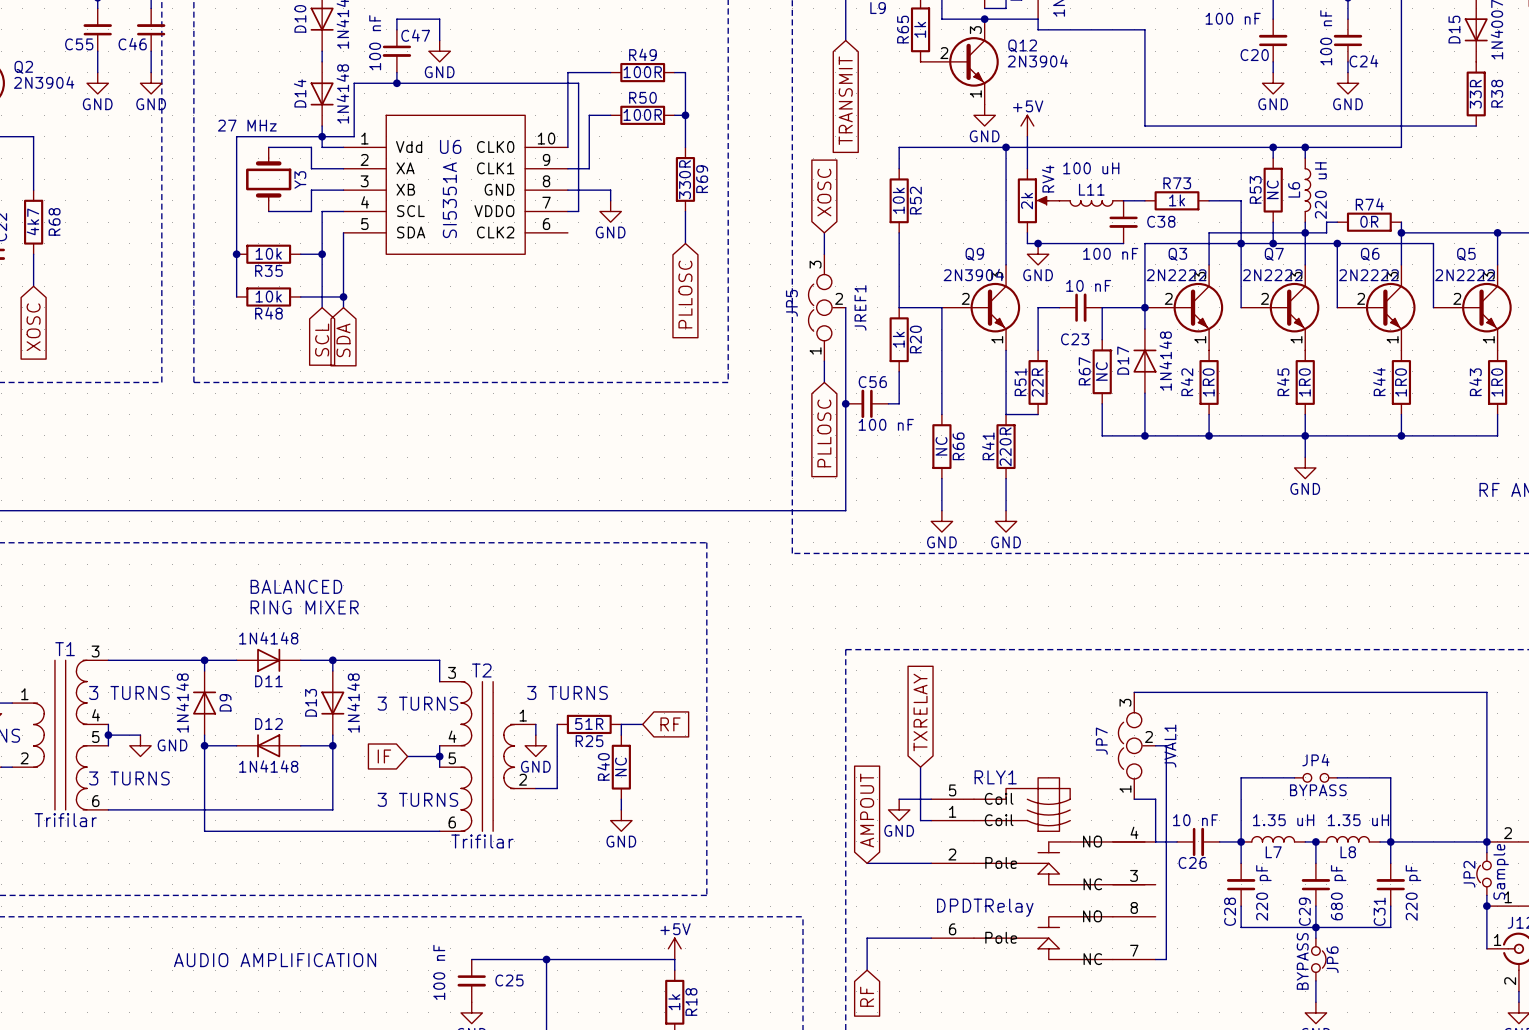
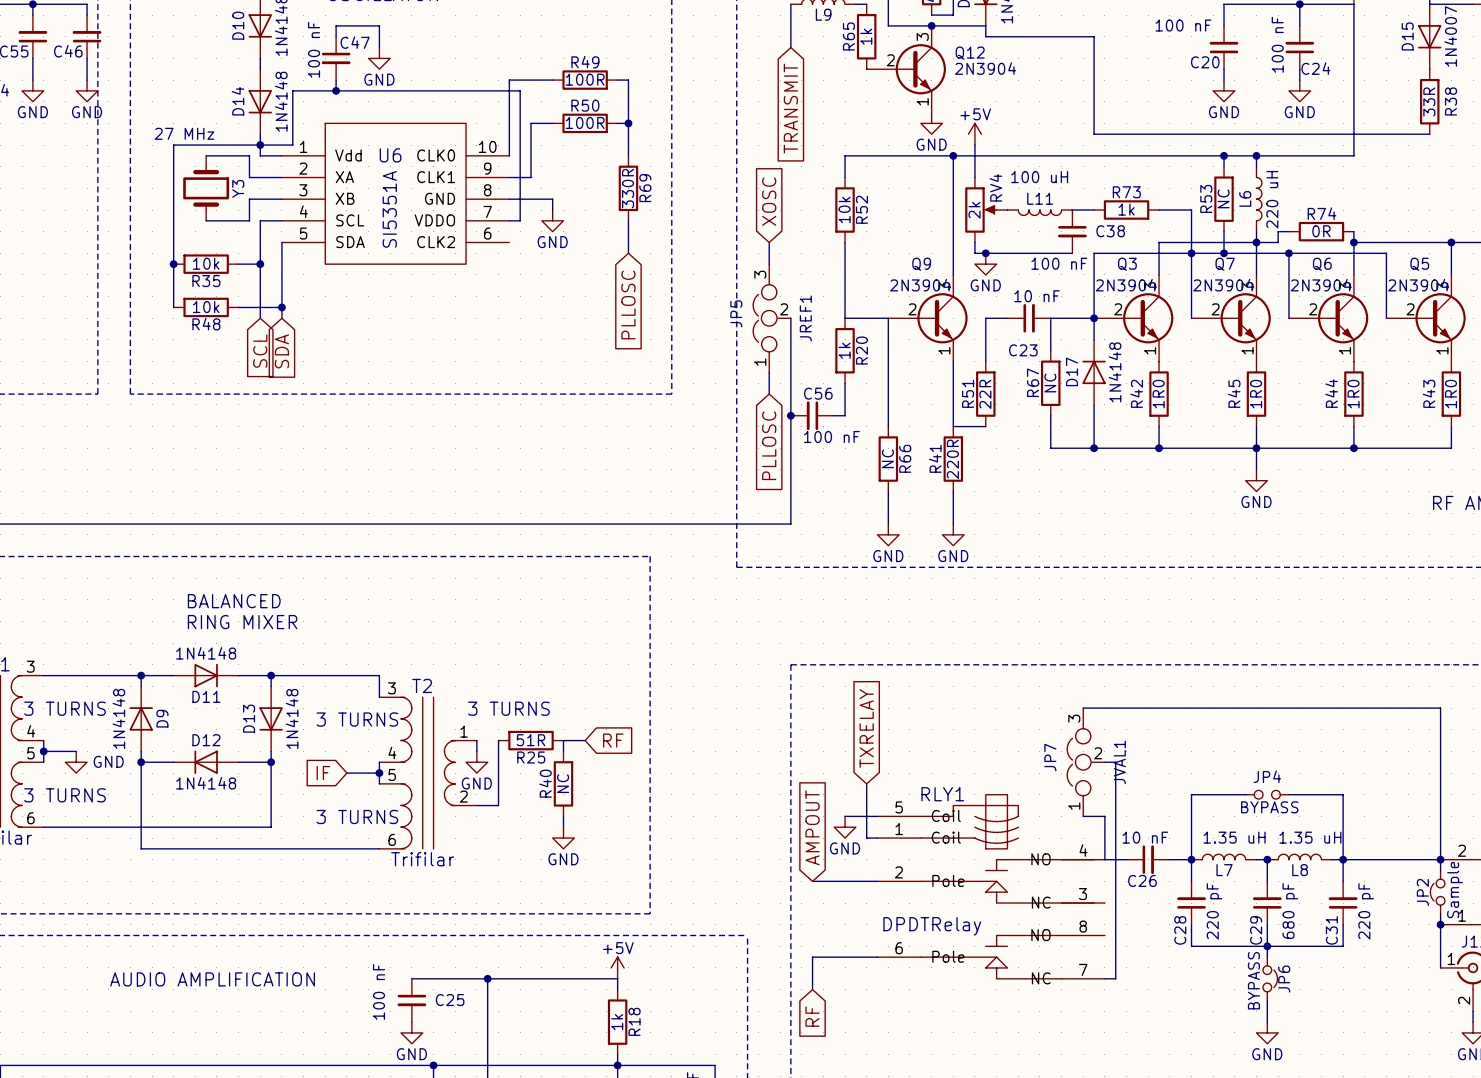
Q3 value: 2N2222 (1176, 275) -> 2N3904 (1126, 285)
Q7 value: 2N2222 (1272, 275) -> 2N3904 (1223, 285)
Q6 value: 2N2222 (1368, 275) -> 2N3904 (1321, 285)
Q5 value: 2N2222 (1465, 275) -> 2N3904 (1418, 285)

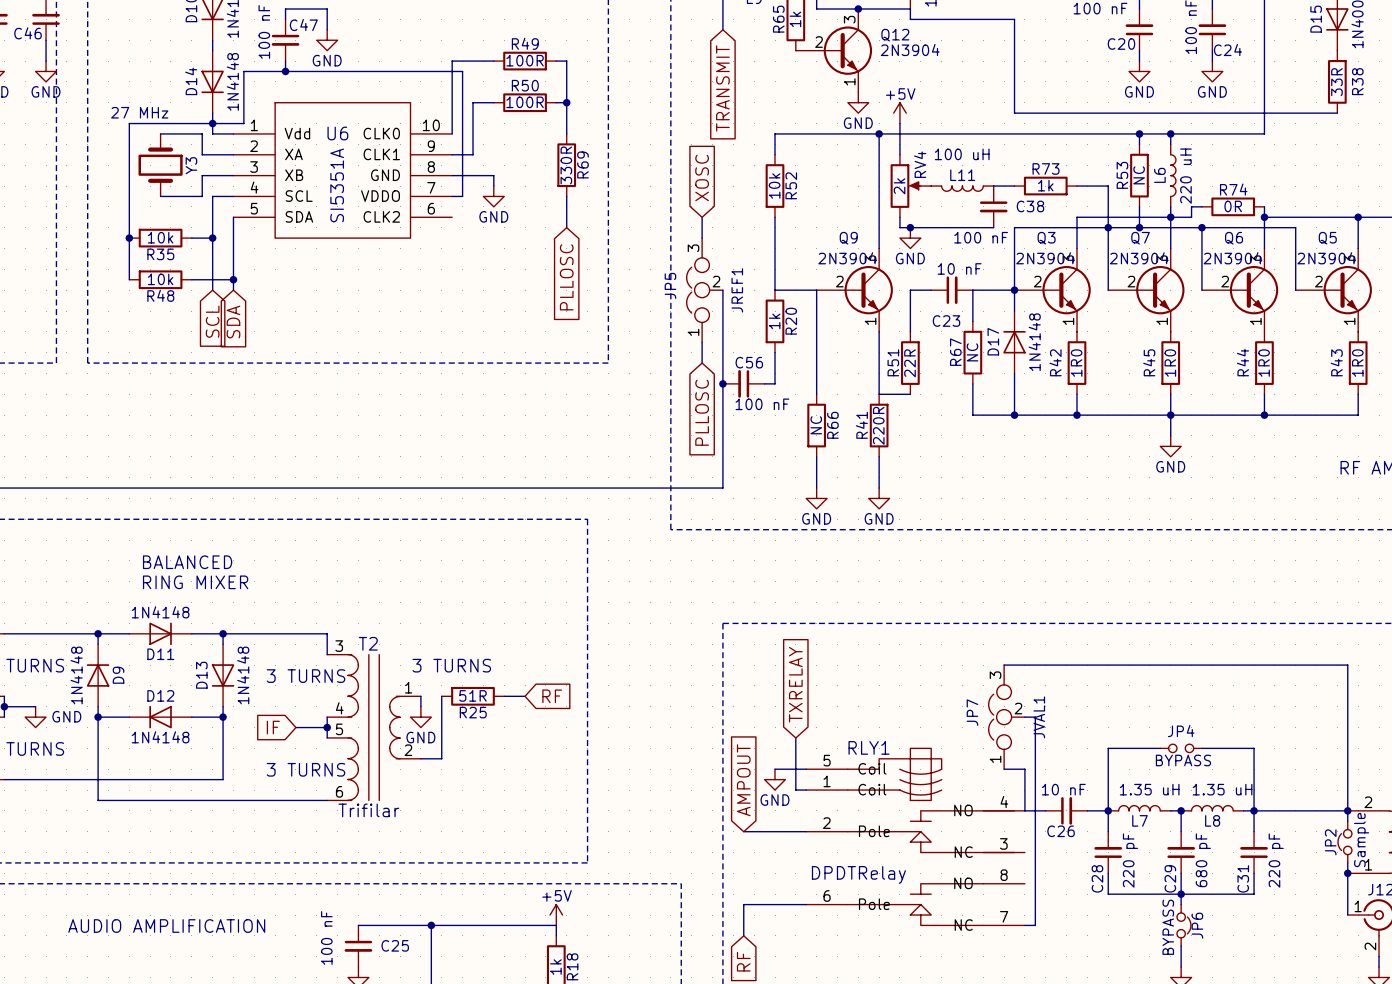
wire: (563, 740) (563, 751) -> none
R40: NC (563, 783) -> none
wire: (563, 816) (563, 827) -> none
power symbol: GND (563, 838) -> none

